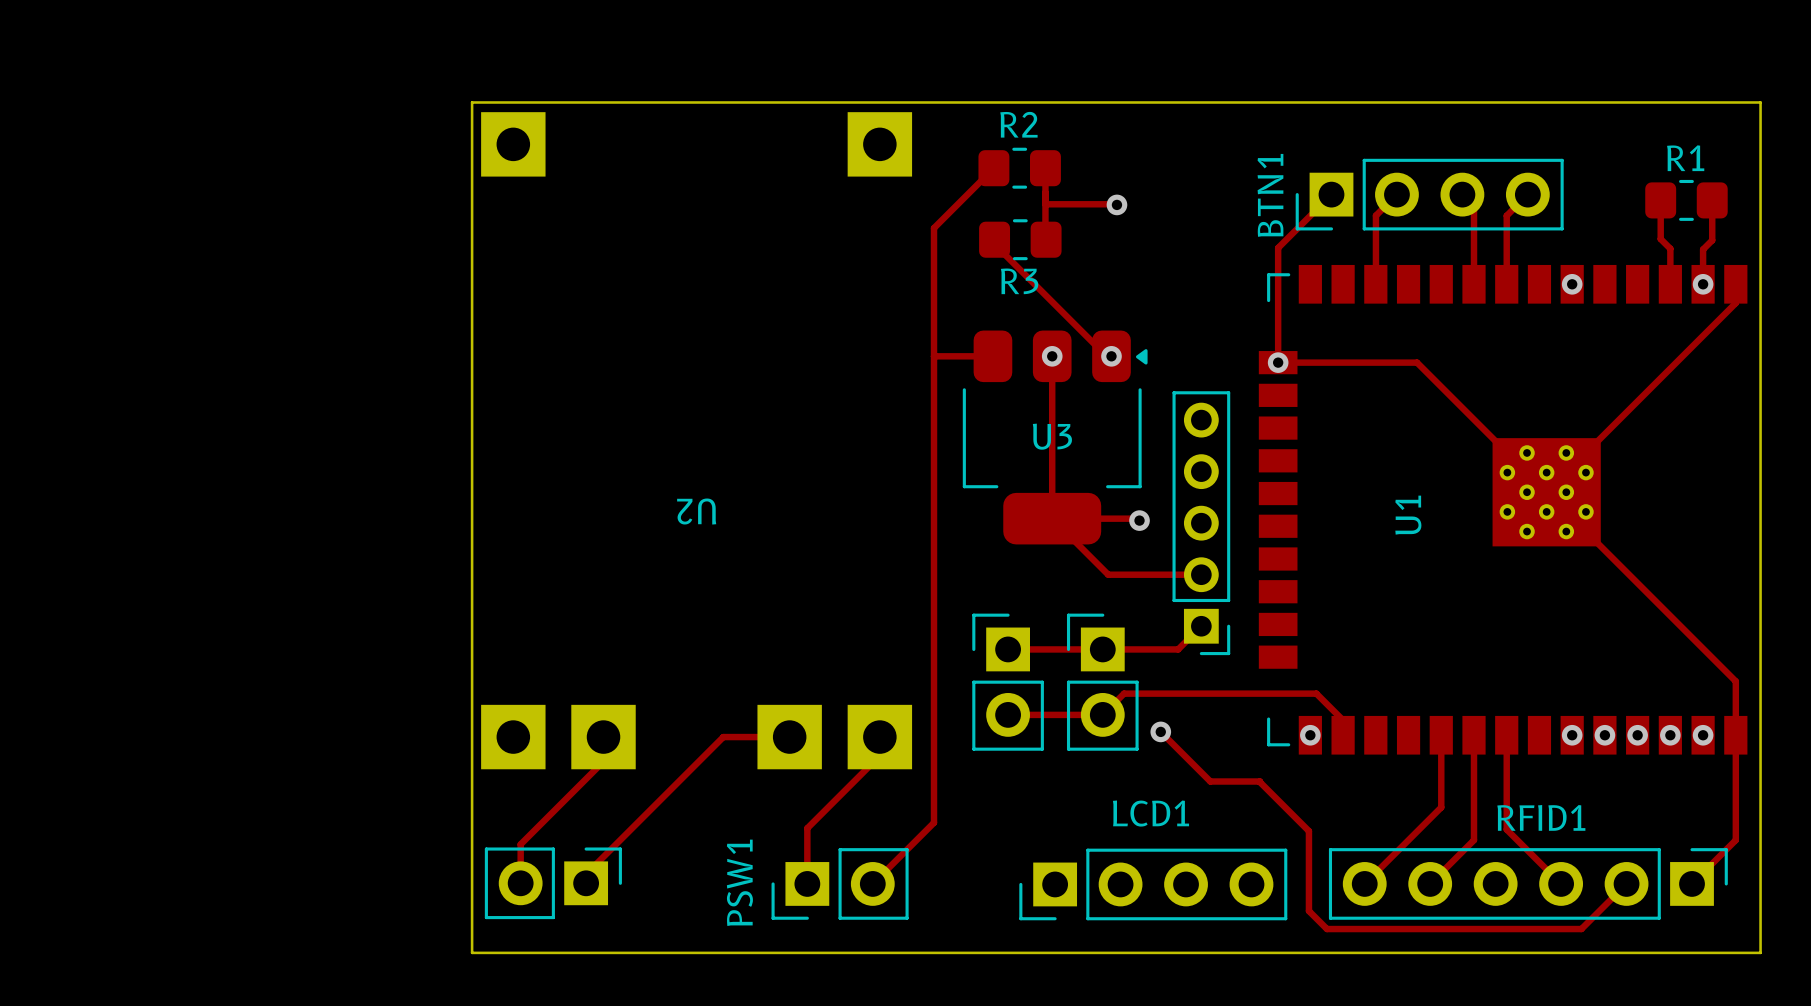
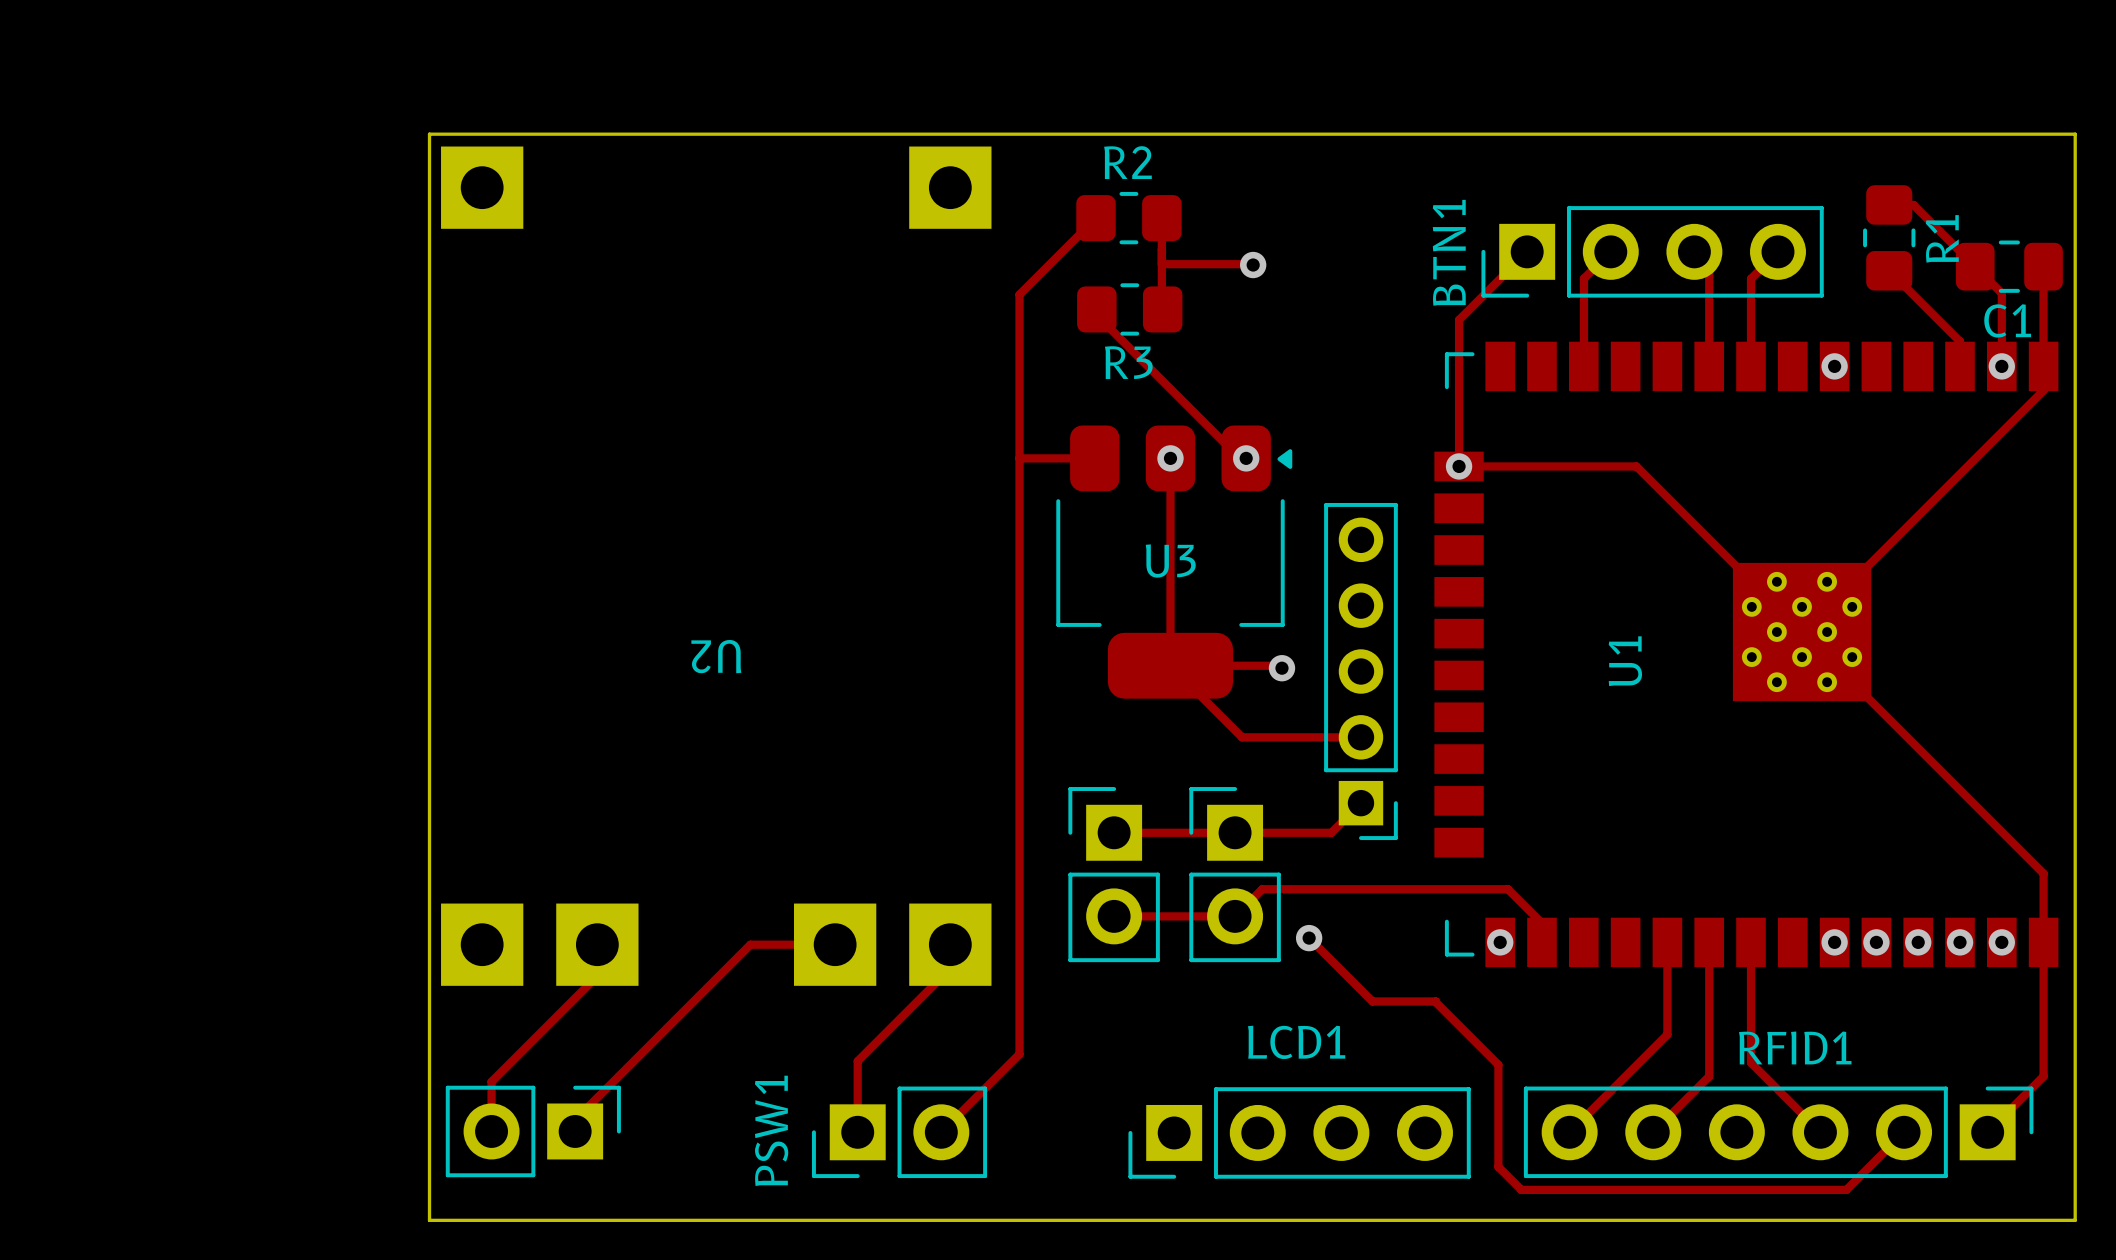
R1 rotation: 0° (1686, 200) -> 90° clockwise (1889, 237)
R1 position: (1686, 200) -> (1889, 237)
C1: none -> (2009, 266)
track: (1660, 208) (1660, 239) (1670, 248) (1670, 264) -> (1889, 270) (1960, 341)
track: (1712, 208) (1712, 240) (1703, 249) -> (1889, 204) (1913, 204) (2001, 293) (2001, 321)

